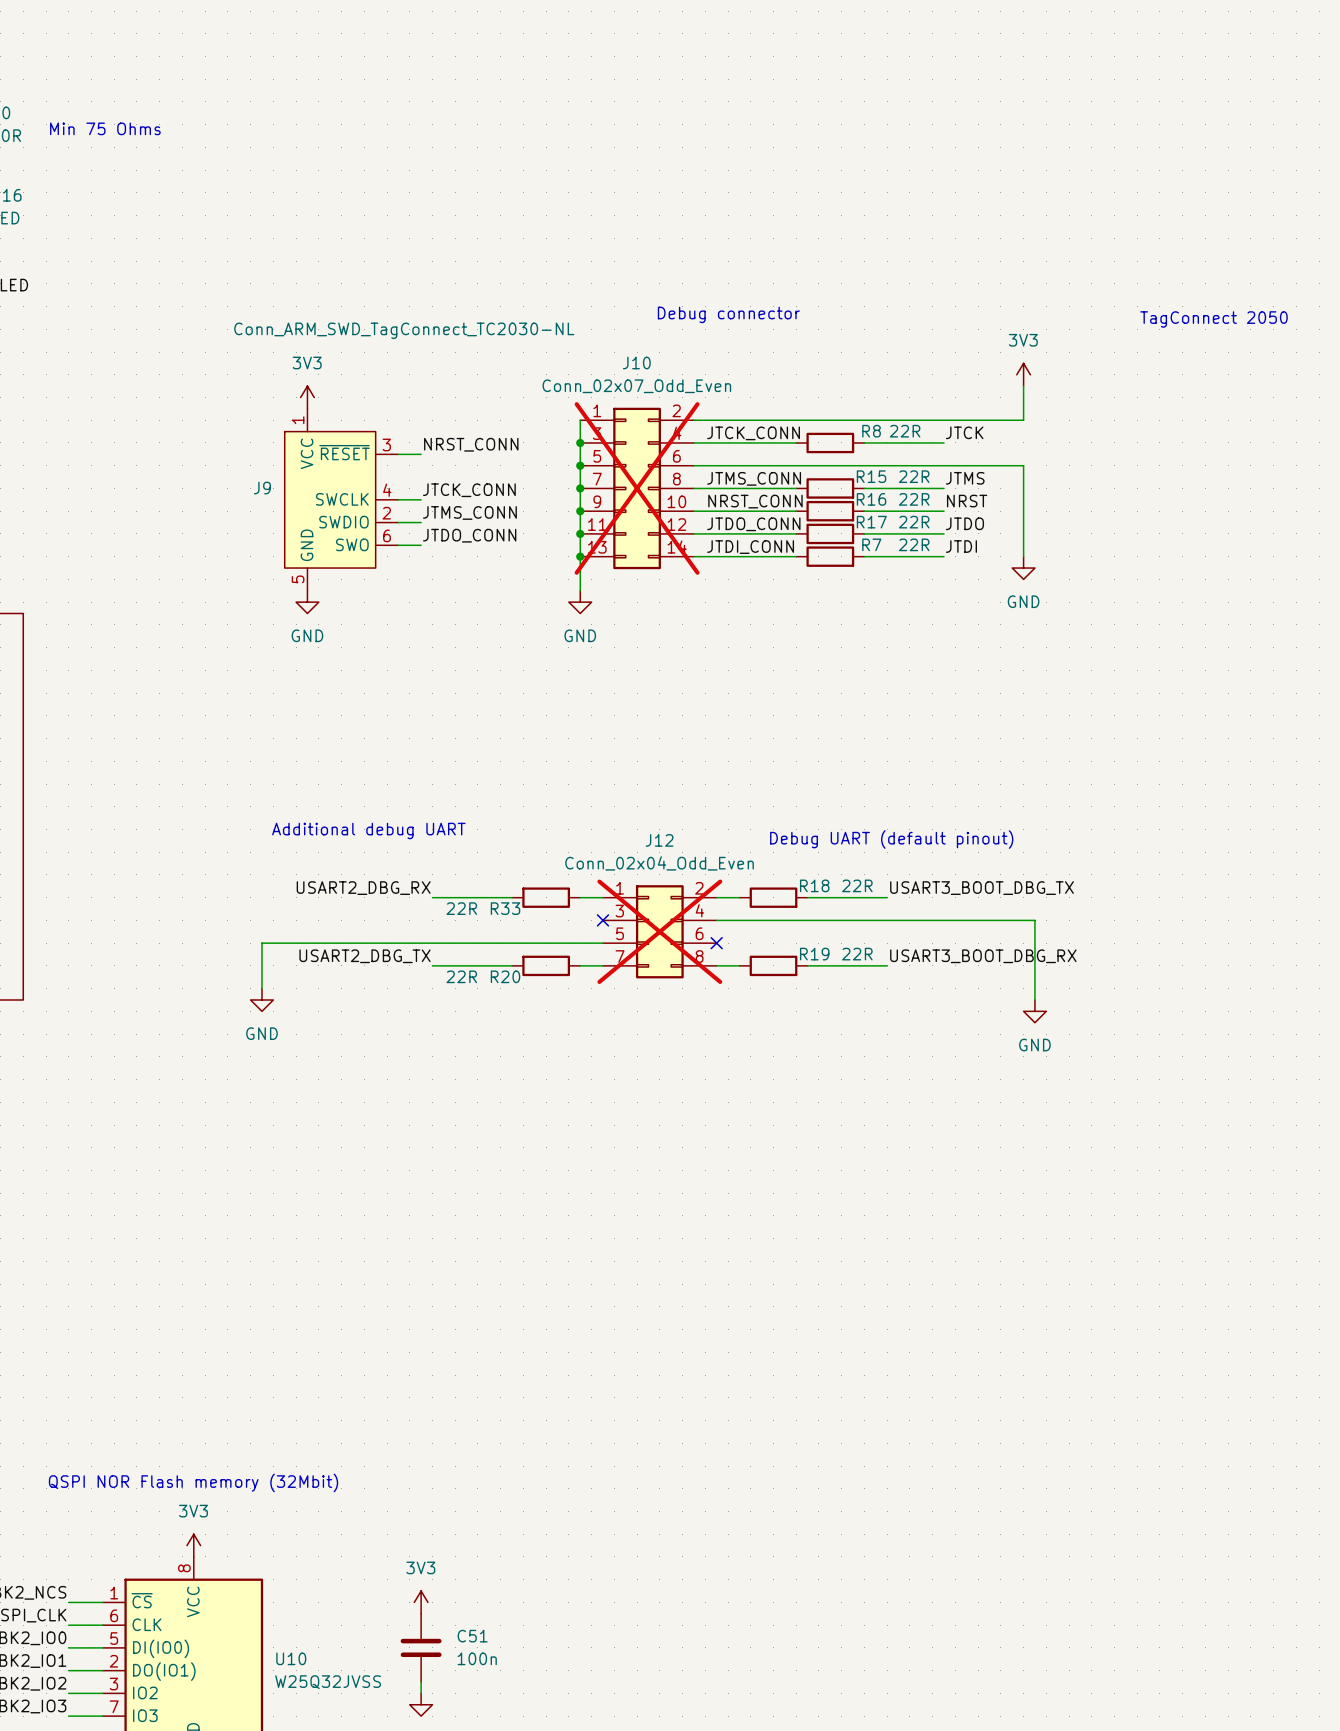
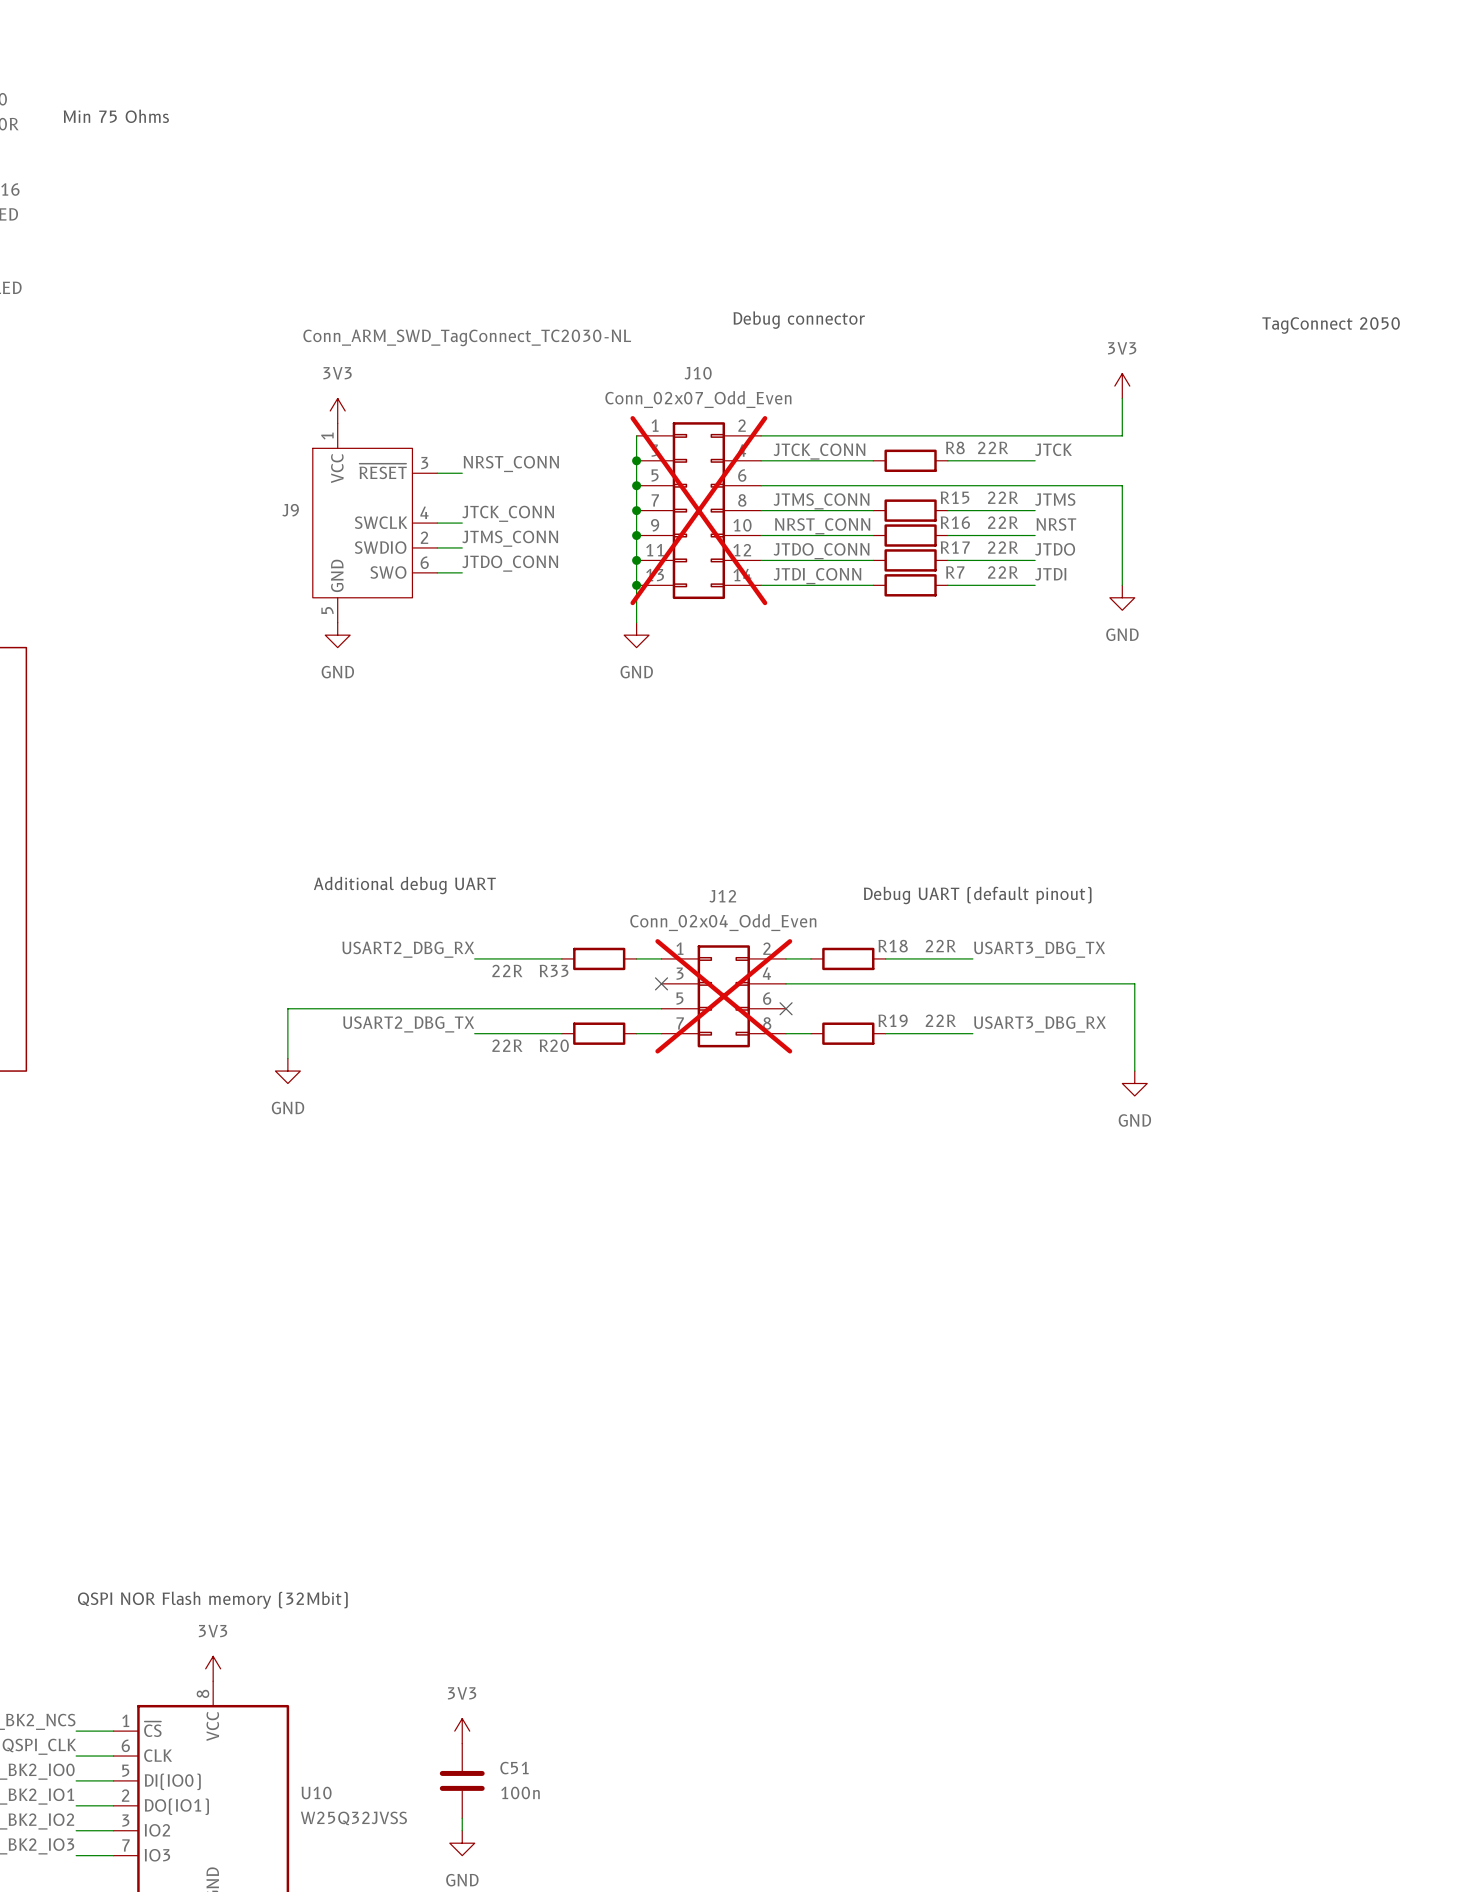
label: USART3_BOOT_DBG_TX (981, 888) -> USART3_DBG_TX (1039, 949)
label: USART3_BOOT_DBG_RX (983, 956) -> USART3_DBG_RX (1039, 1024)

